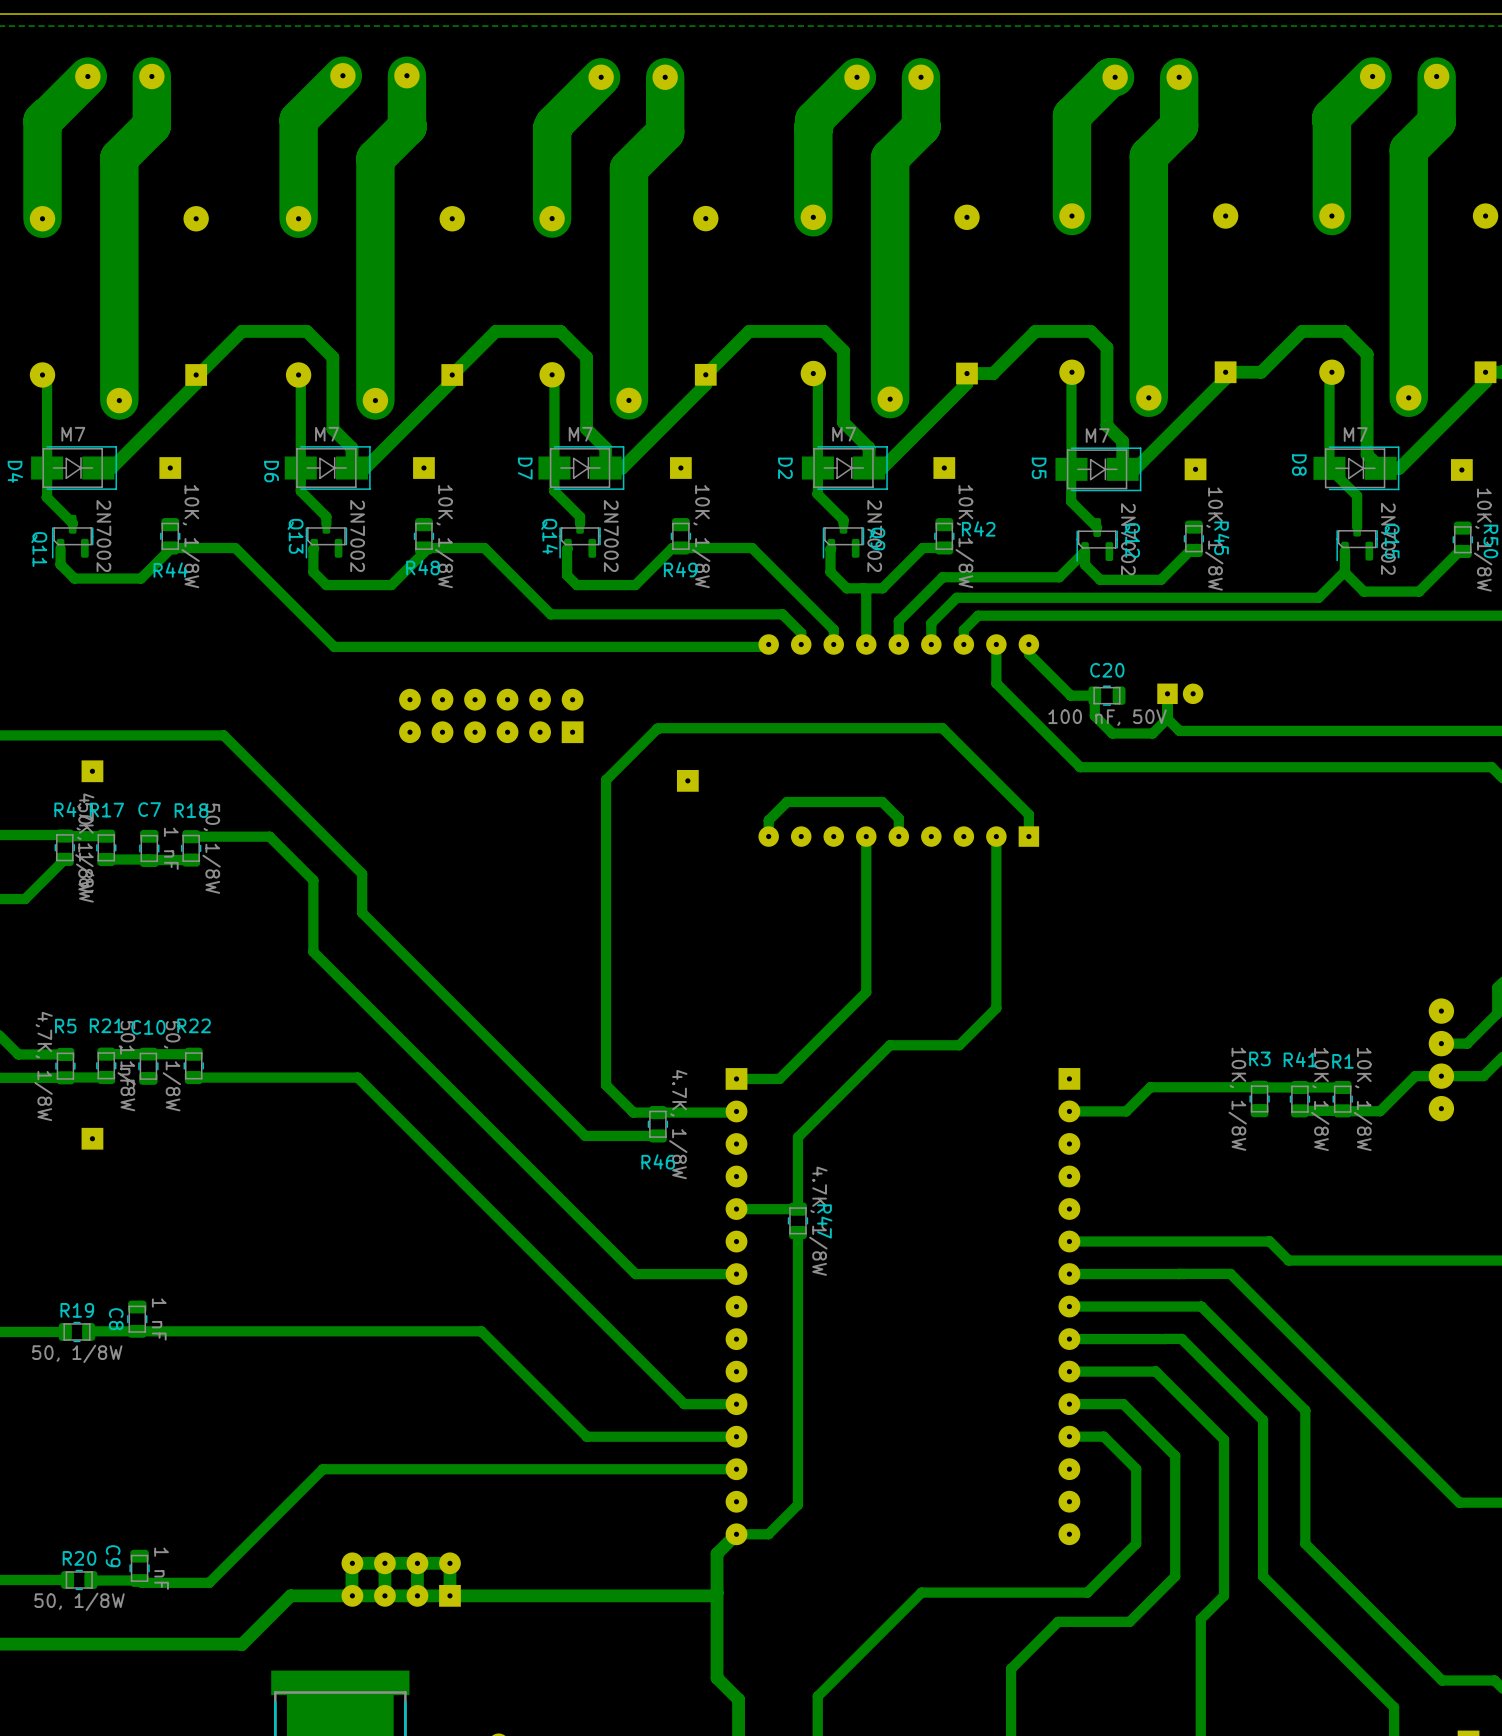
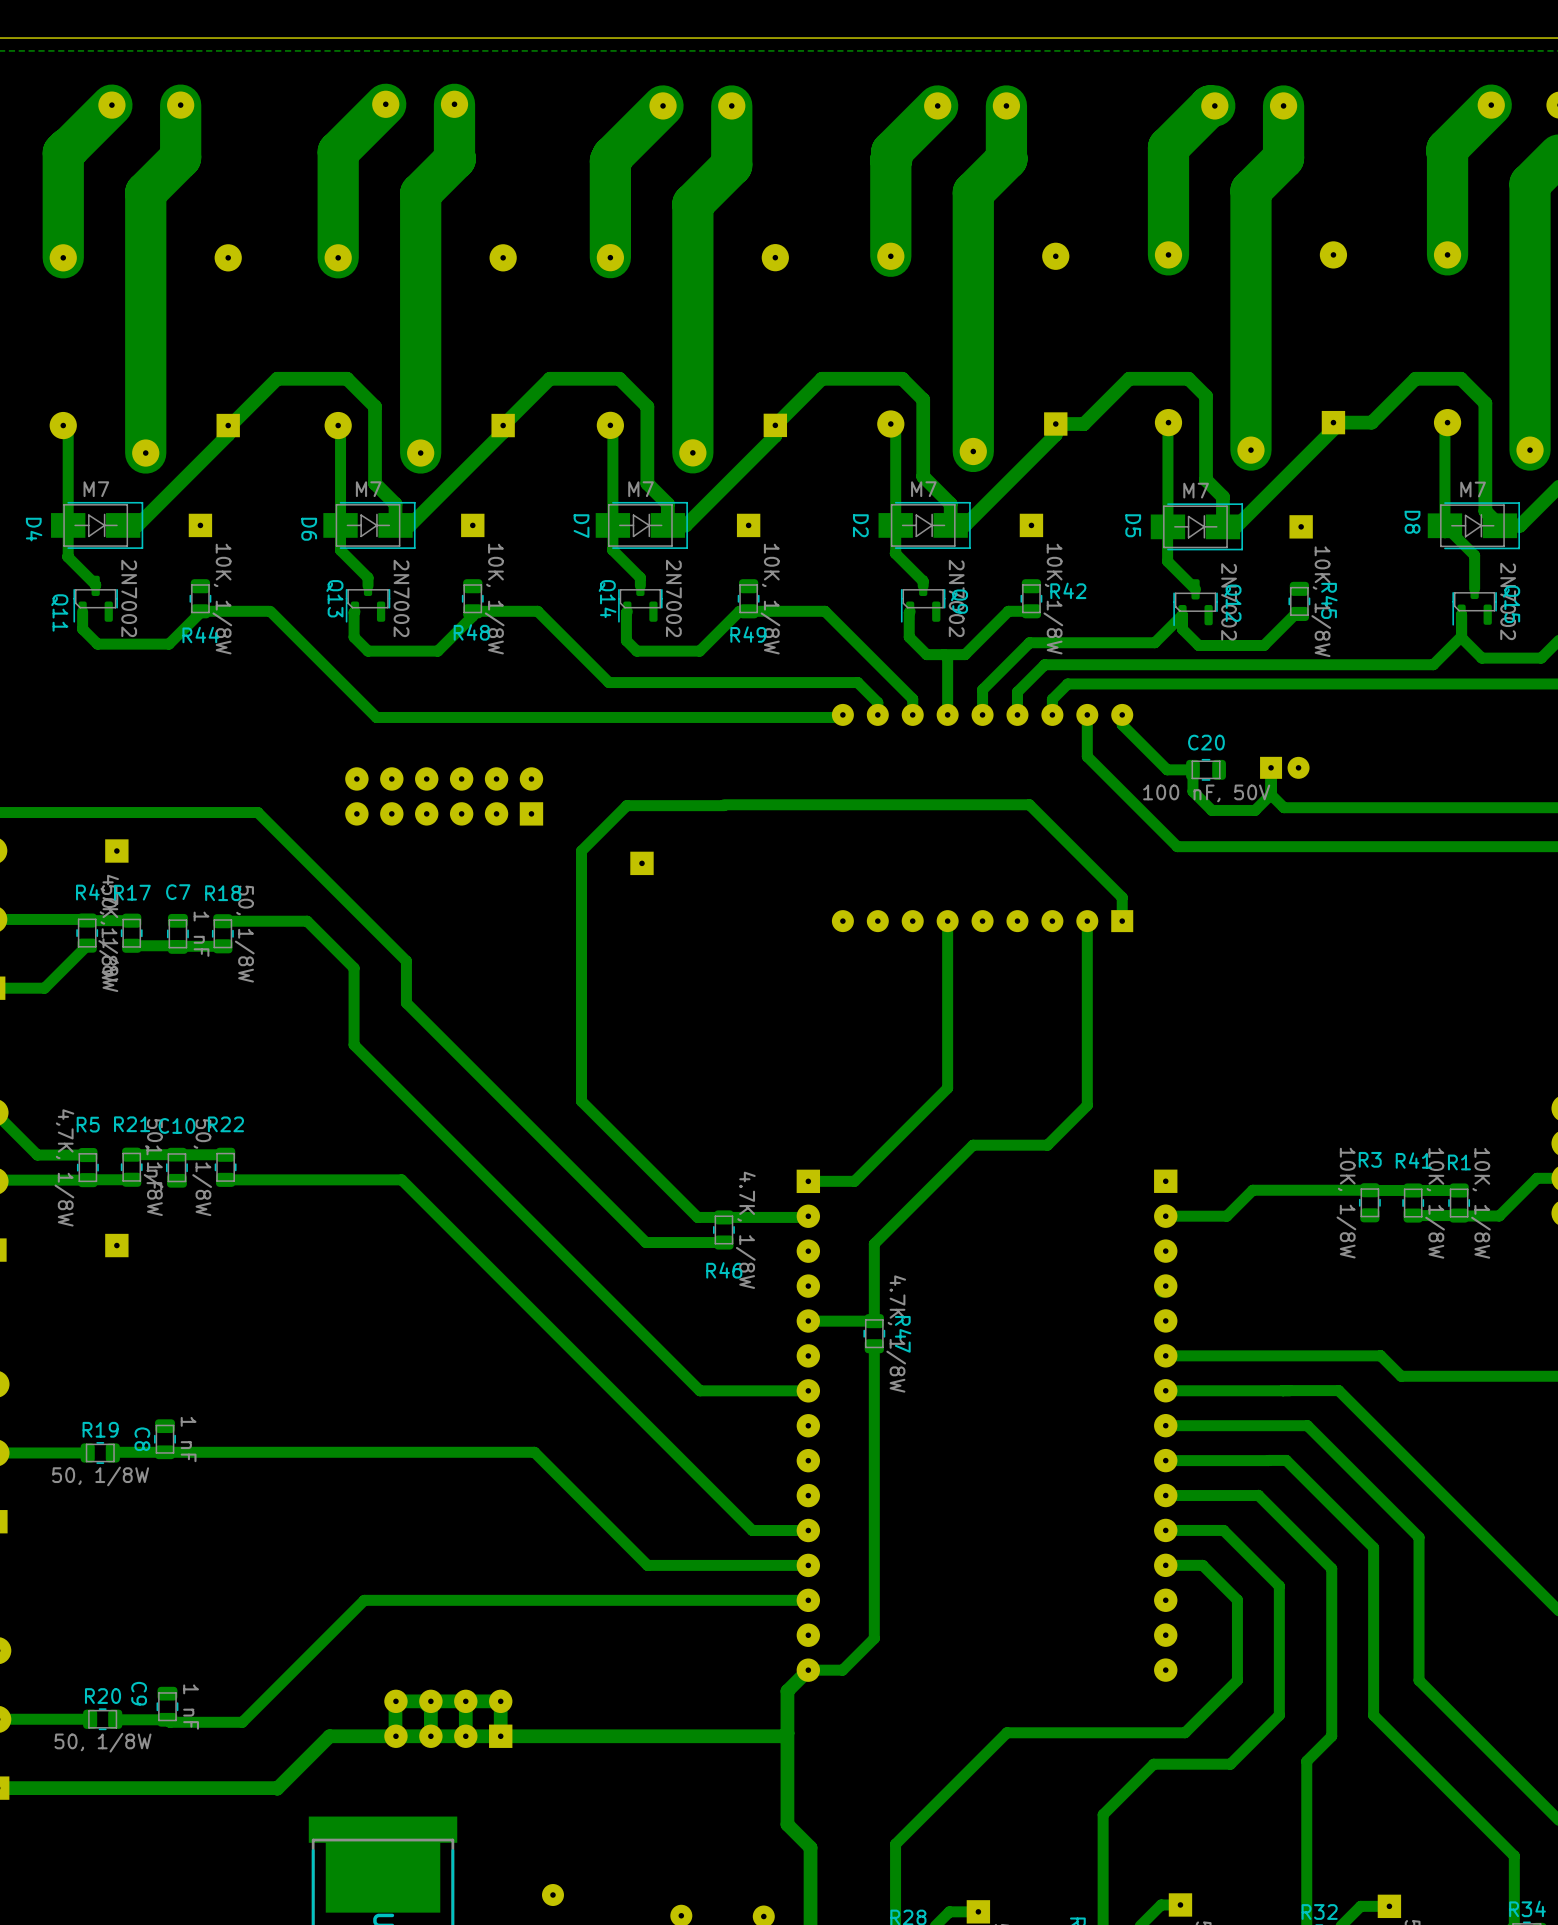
part position: (491, 715) -> (444, 796)
bottom track: (657, 729) (606, 780) (606, 1085) -> (723, 805) (626, 805) (581, 851) (581, 1101) (668, 1188)
part position: (687, 780) -> (641, 863)
bottom track: (898, 836) (898, 818) (882, 802) (787, 802) (768, 820) (768, 836) -> none

